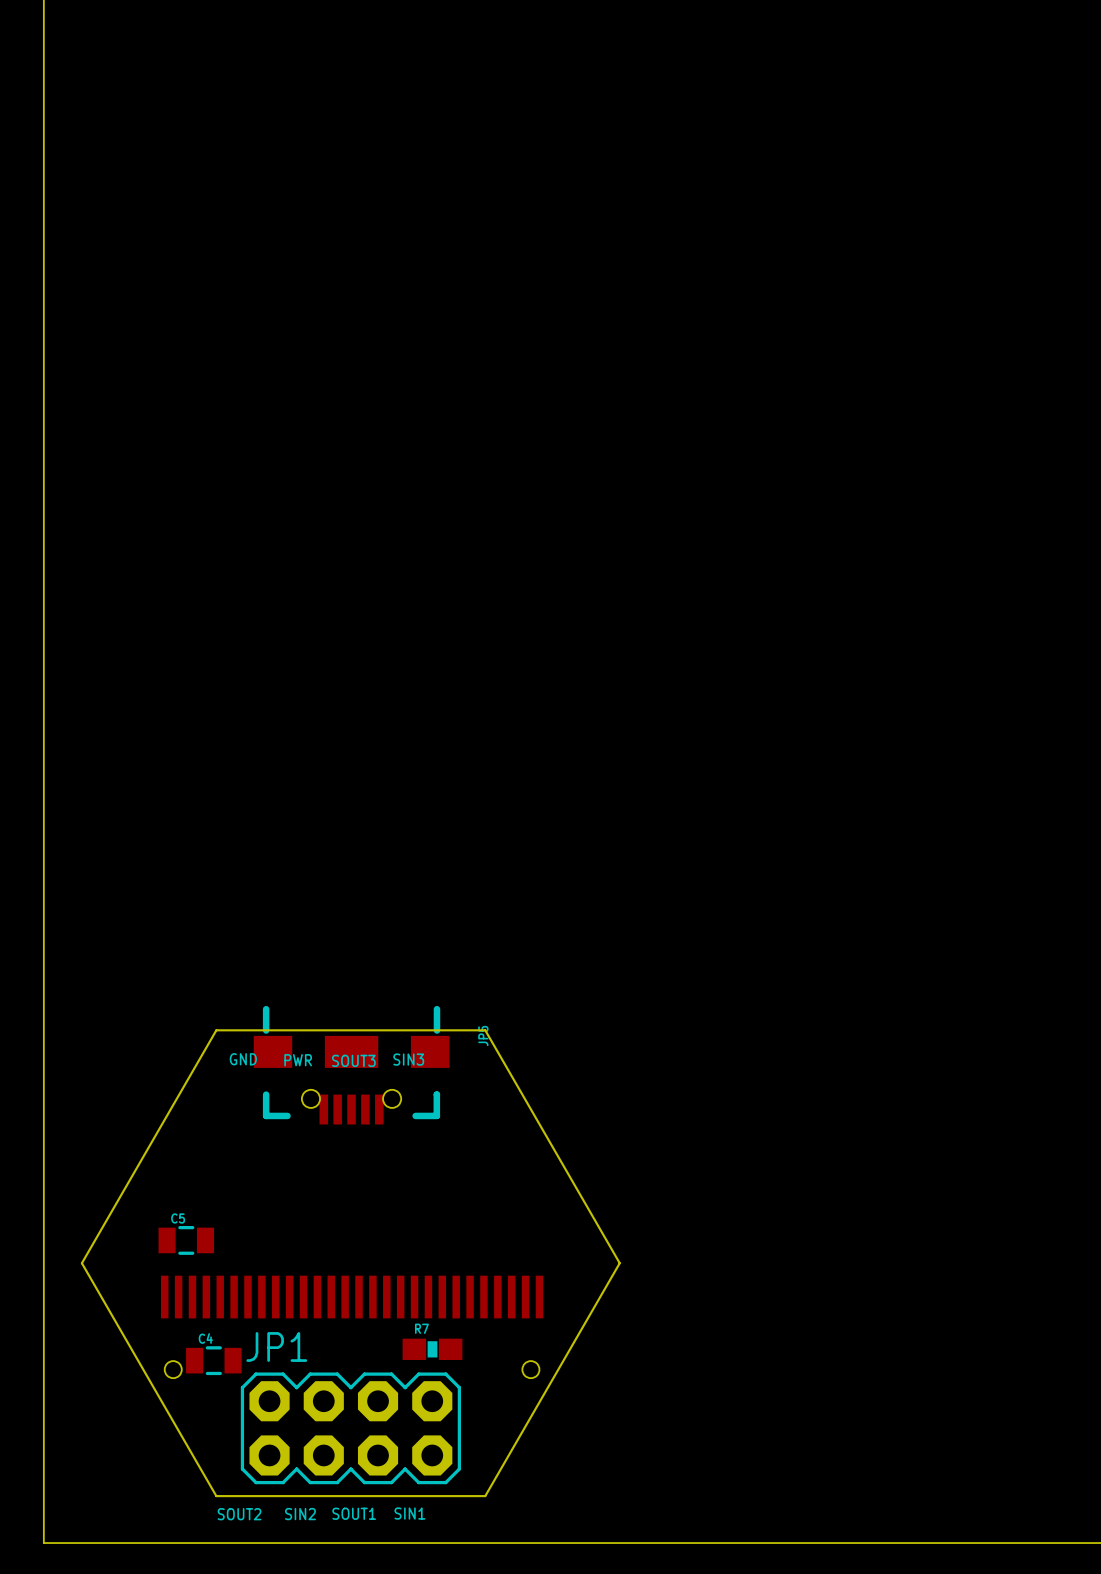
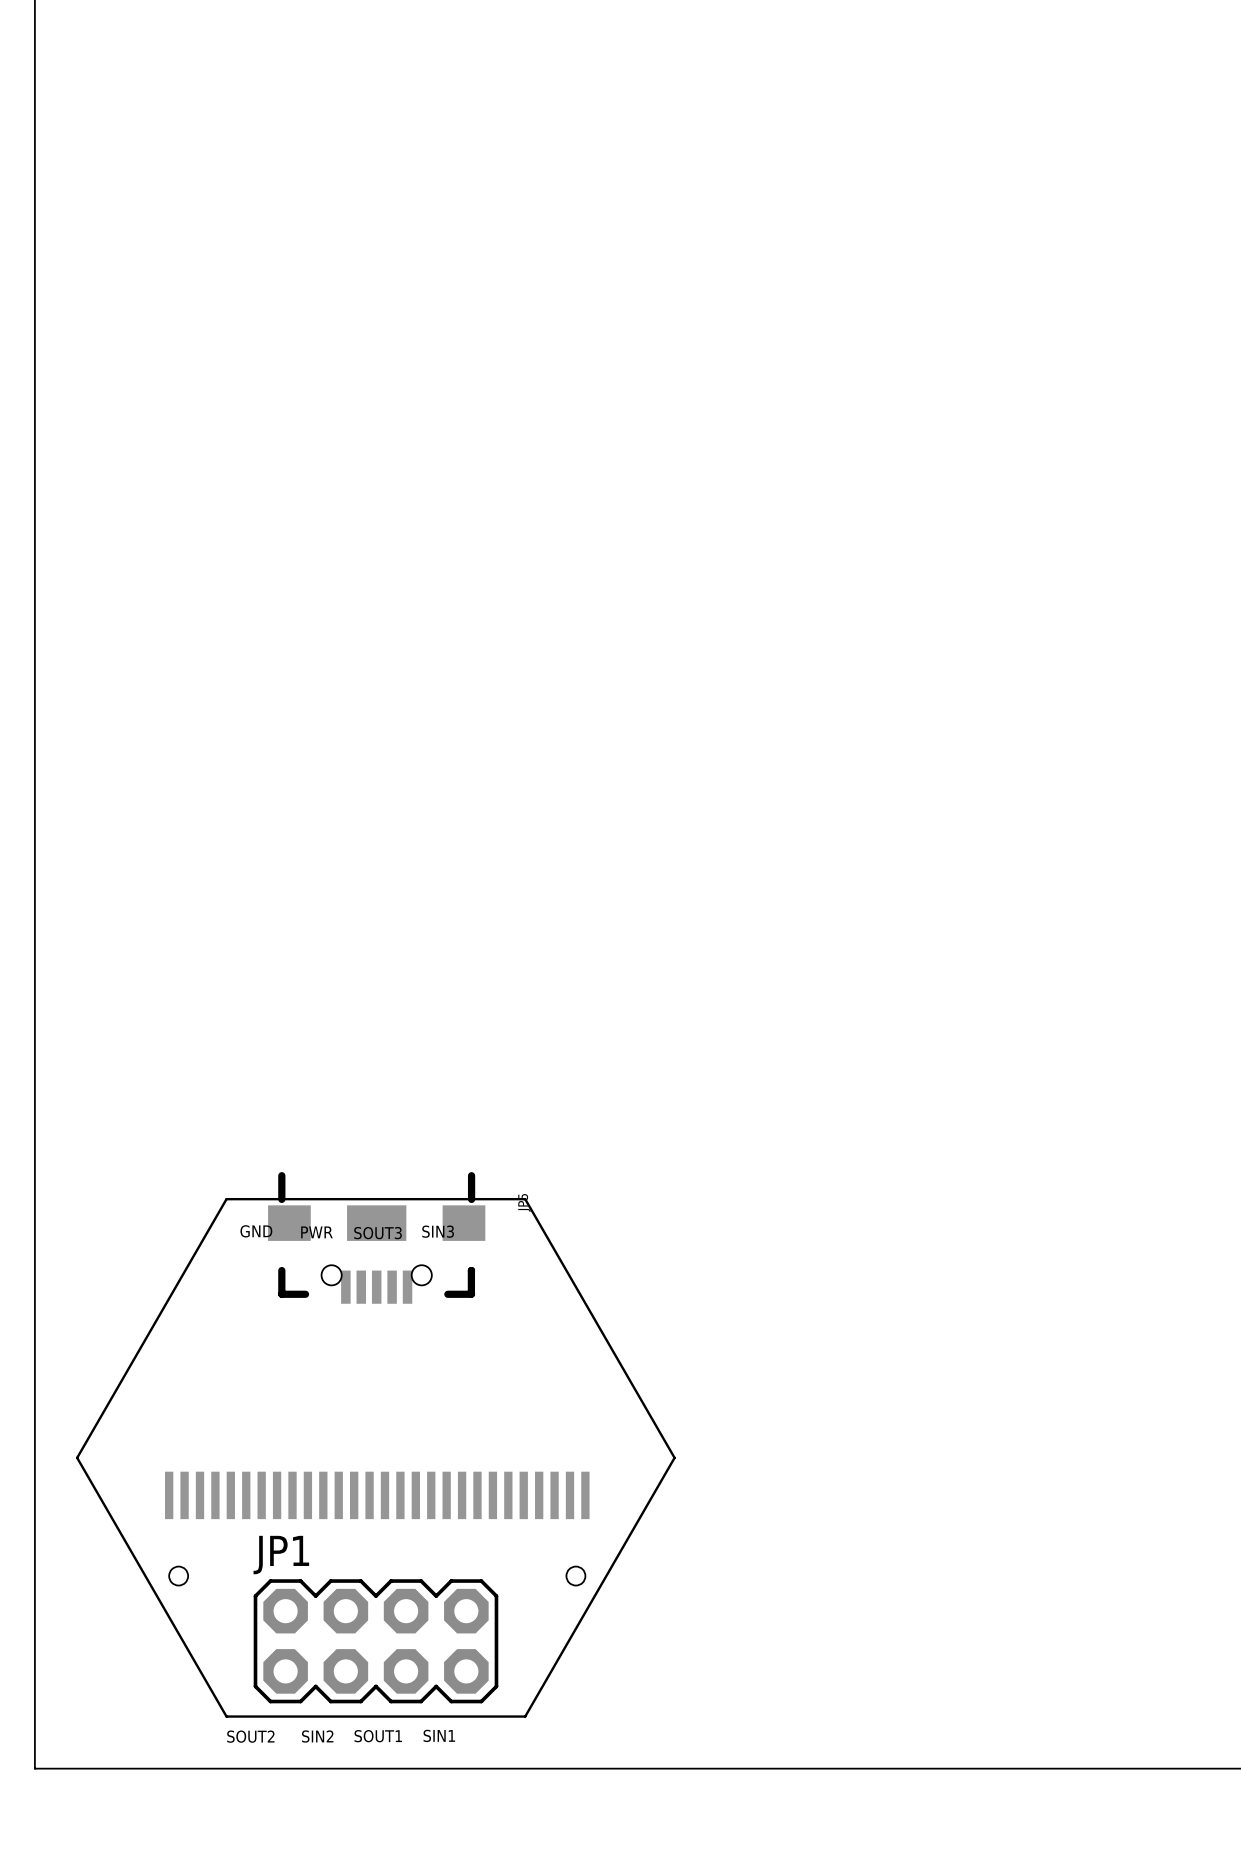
C5: (186, 1240) -> none
R7: (432, 1349) -> none
C4: (213, 1360) -> none

